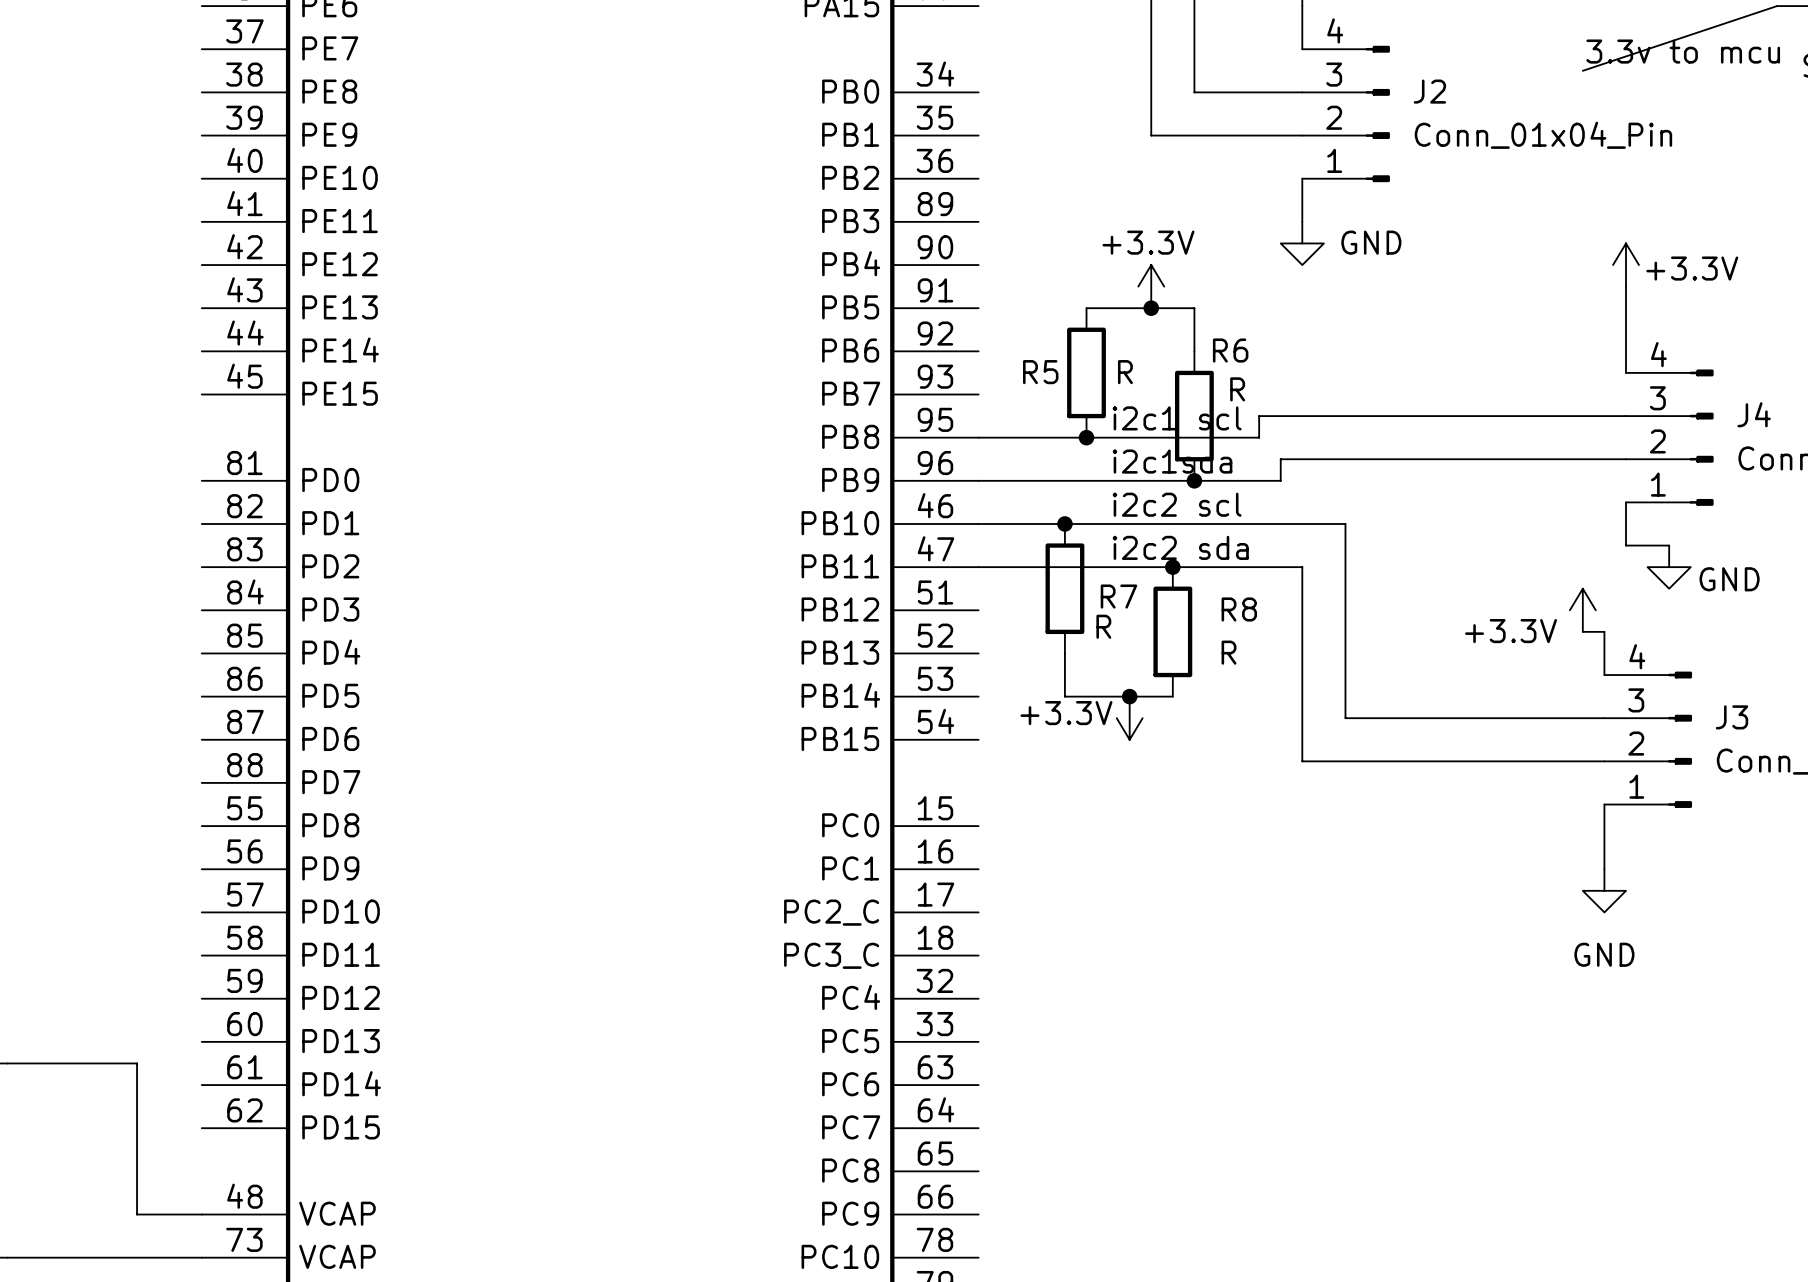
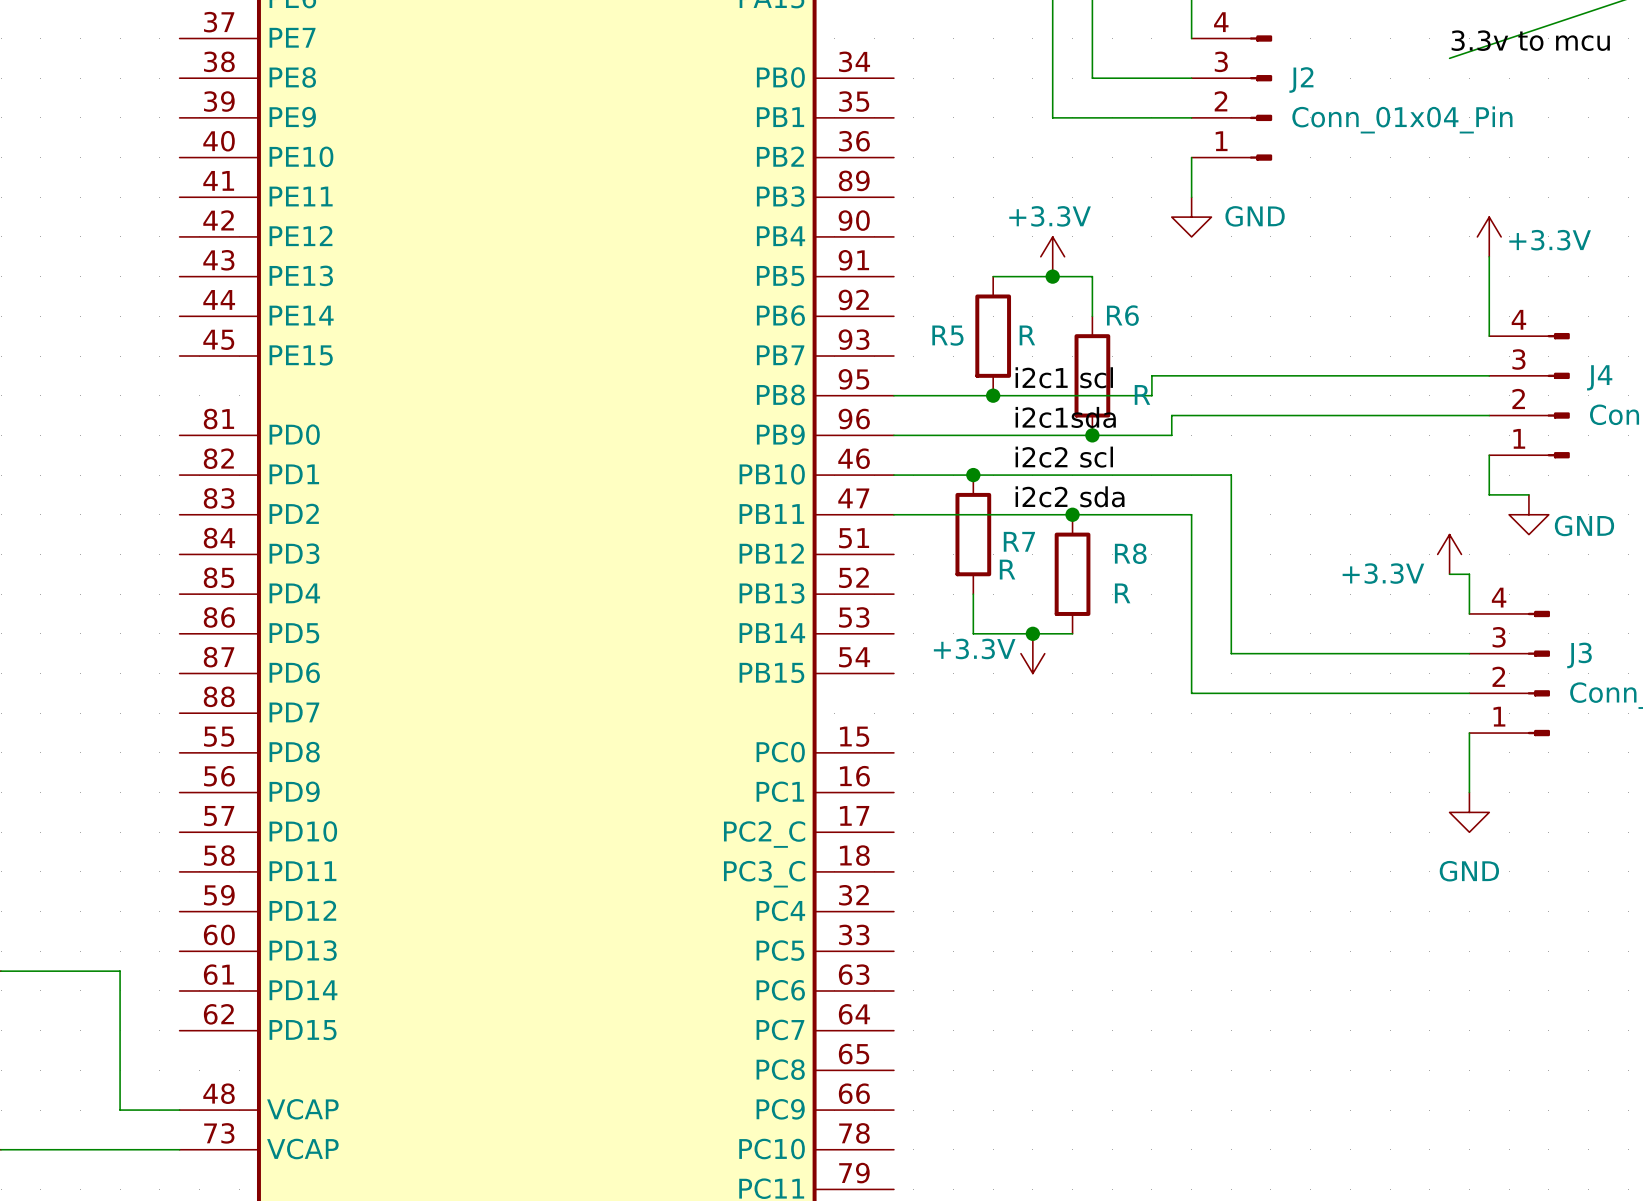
R6 value position: R (1237, 389) -> R (1142, 394)

